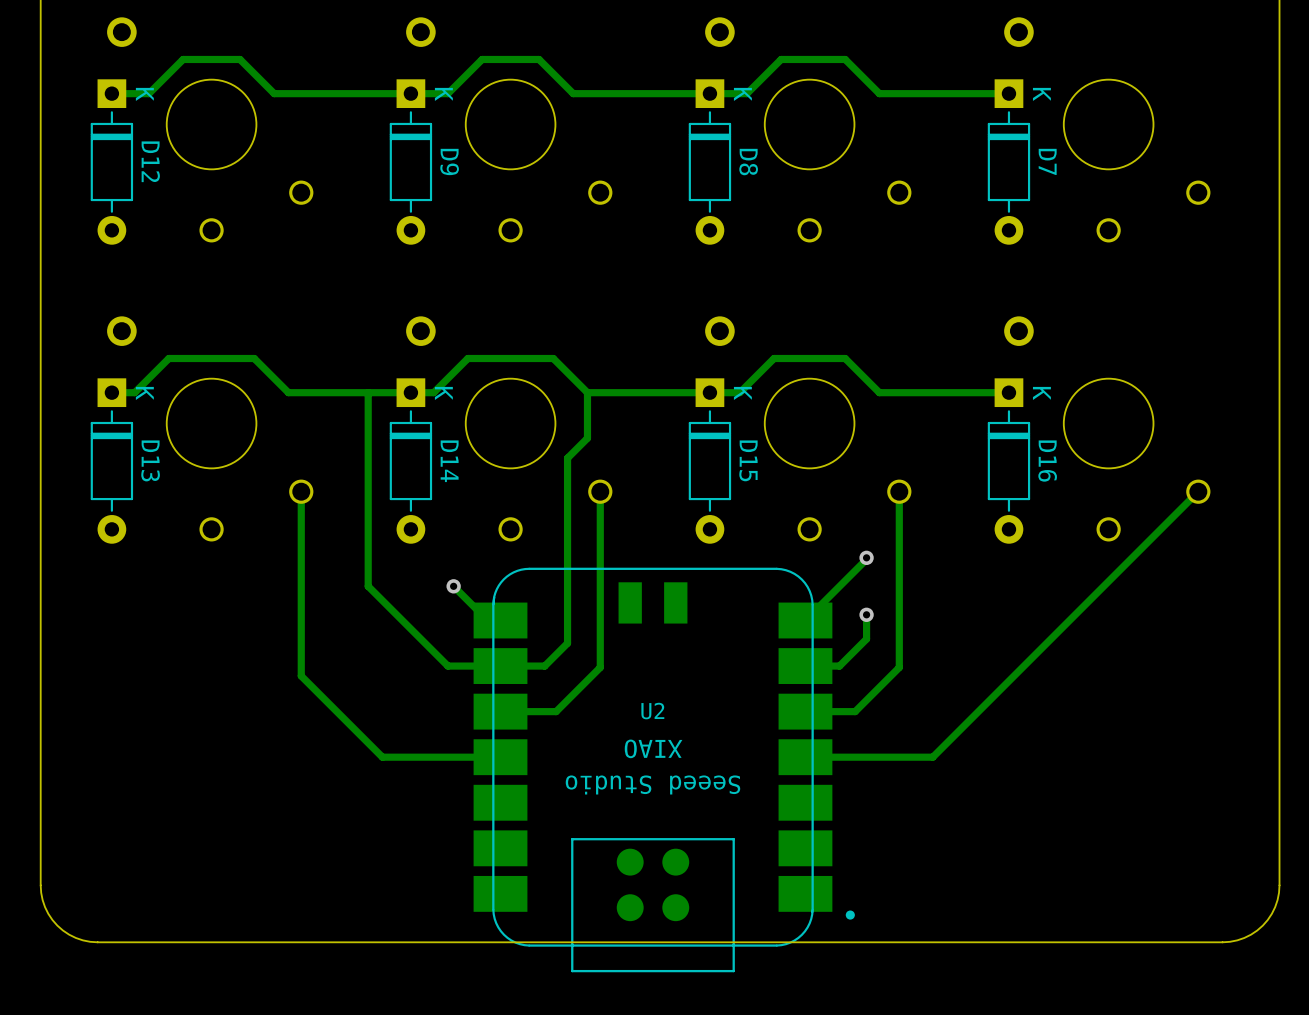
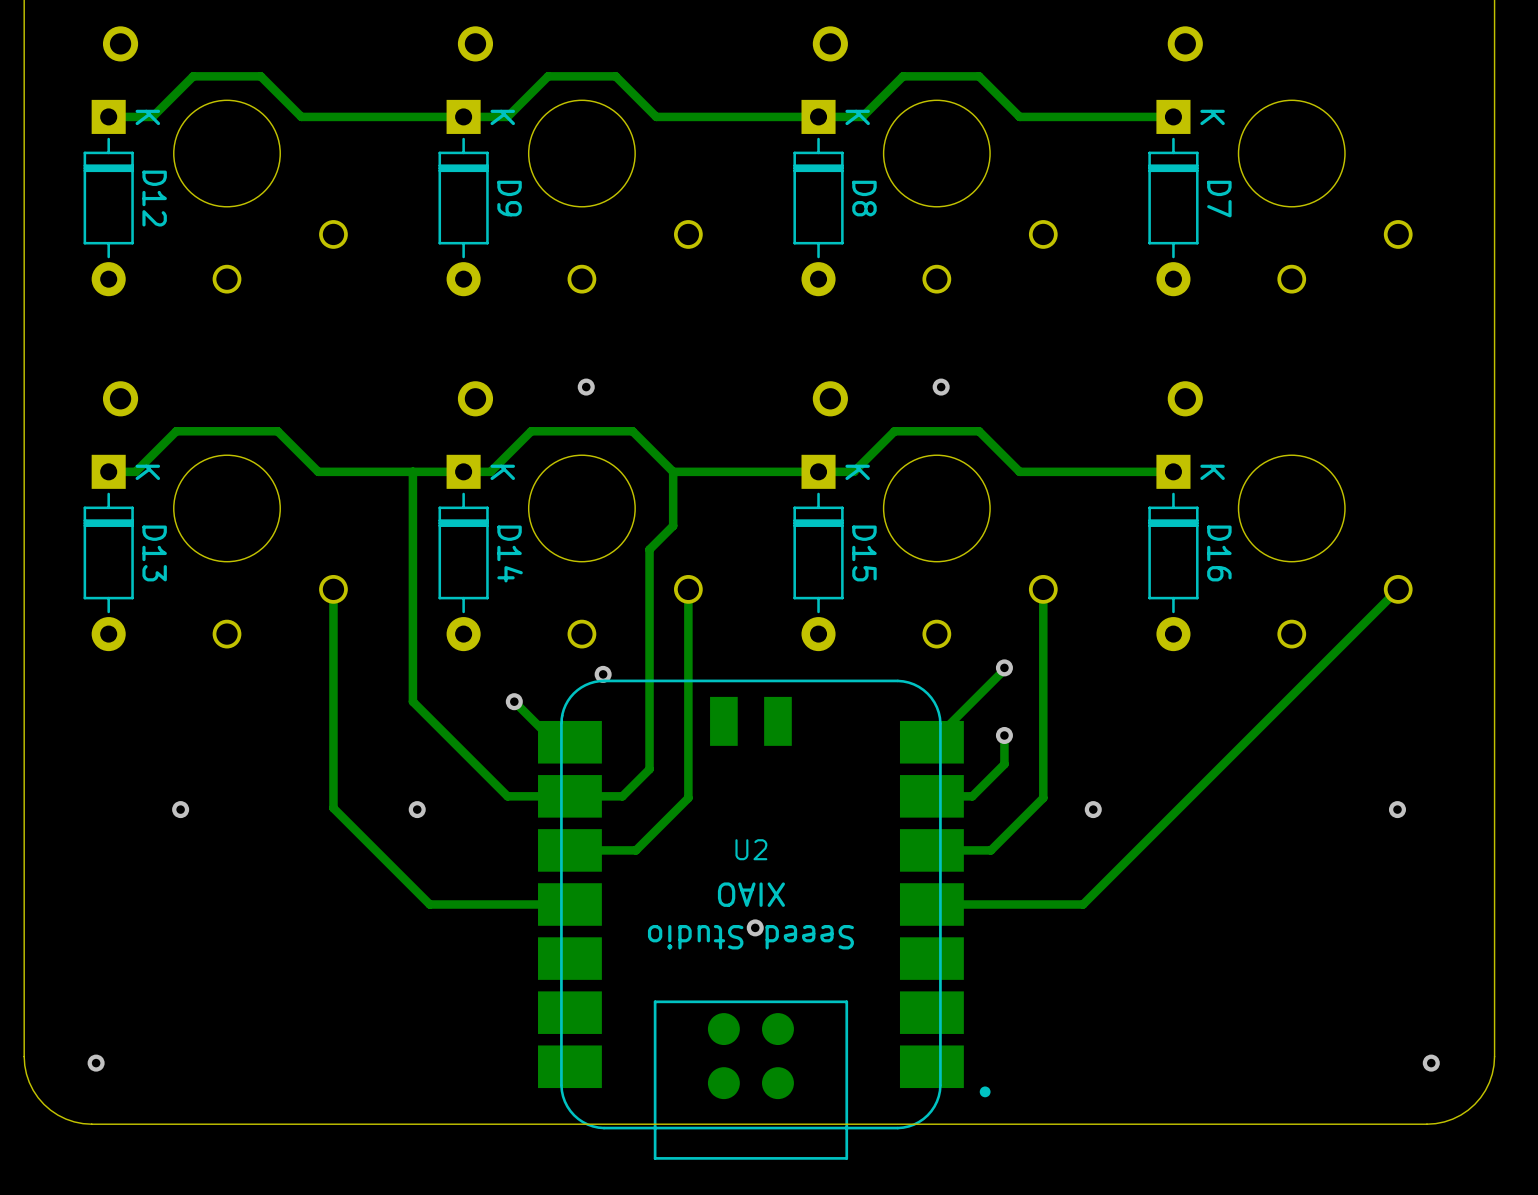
via: none -> (586, 387)
via: none -> (941, 387)
via: none -> (603, 674)
via: none -> (180, 809)
via: none -> (417, 809)
via: none -> (1093, 809)
via: none -> (1397, 809)
via: none -> (755, 927)
via: none -> (96, 1063)
via: none -> (1431, 1063)

